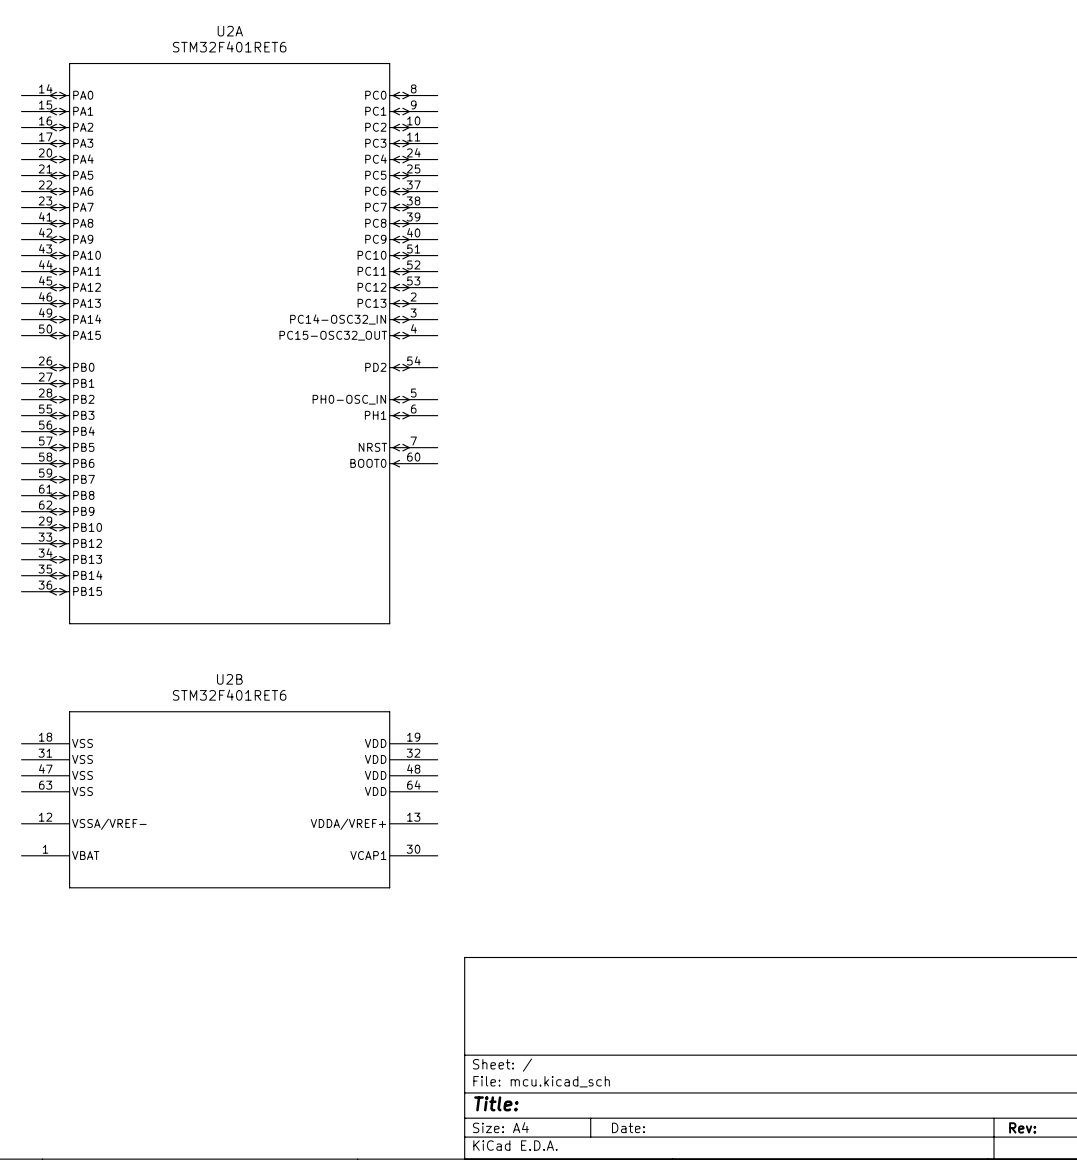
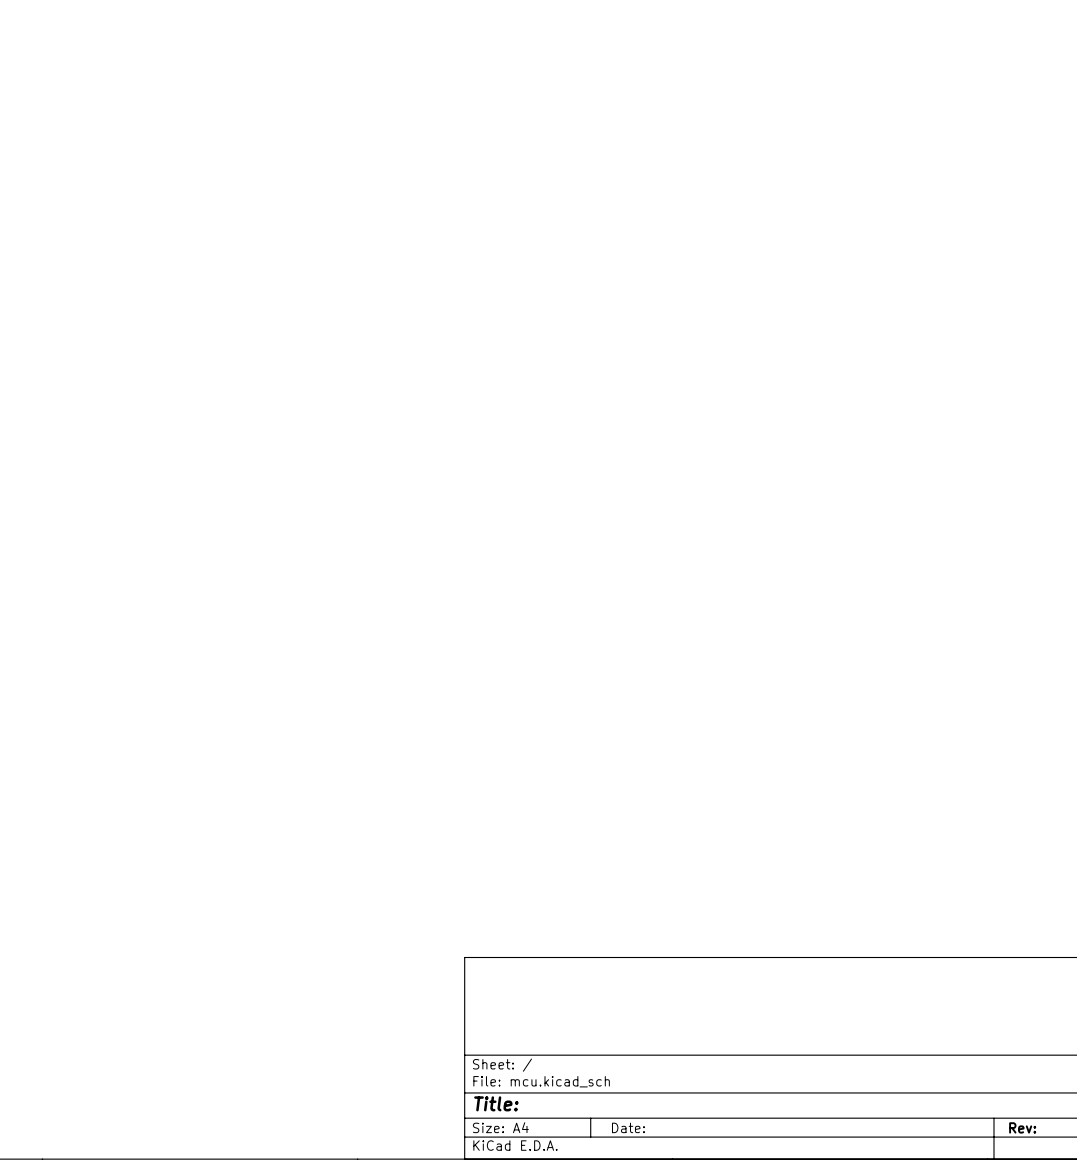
U2A: STM32F401RET6 (229, 343) -> none
U2B: STM32F401RET6 (229, 799) -> none

